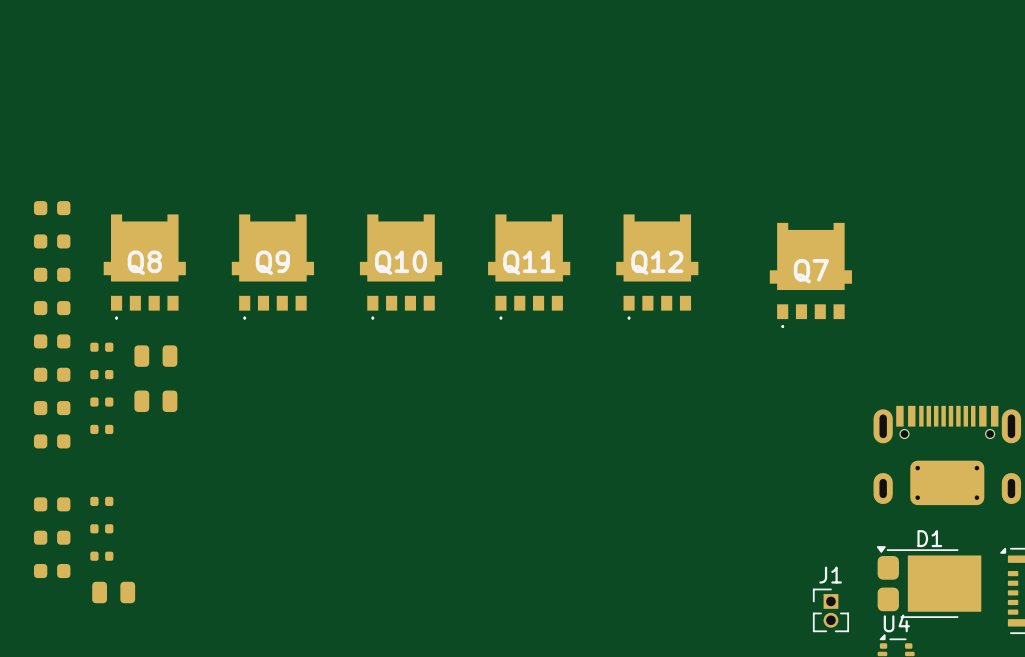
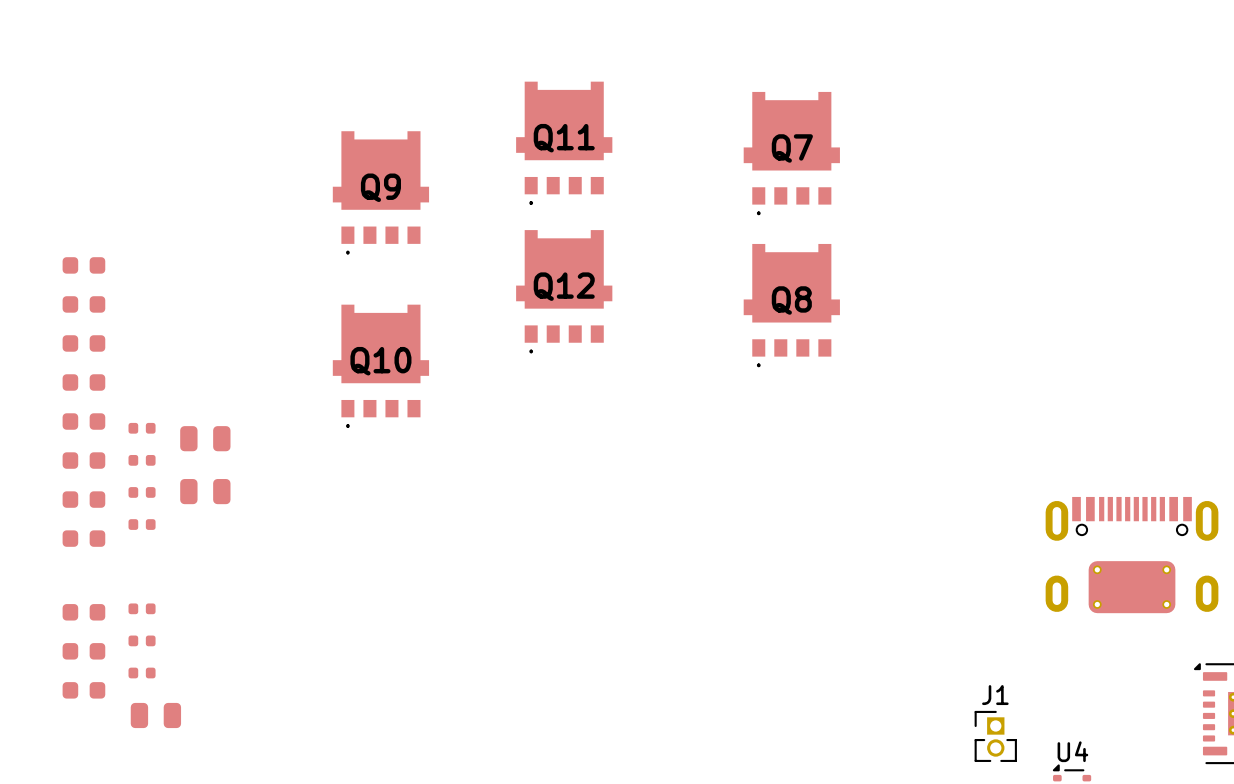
Q8 position: (144, 266) -> (791, 305)
Q9 position: (272, 266) -> (380, 192)
Q10 position: (401, 266) -> (380, 366)
Q11 position: (529, 266) -> (564, 143)
Q12 position: (657, 266) -> (564, 291)
Q7 position: (810, 275) -> (791, 153)
D1: (929, 582) -> none

